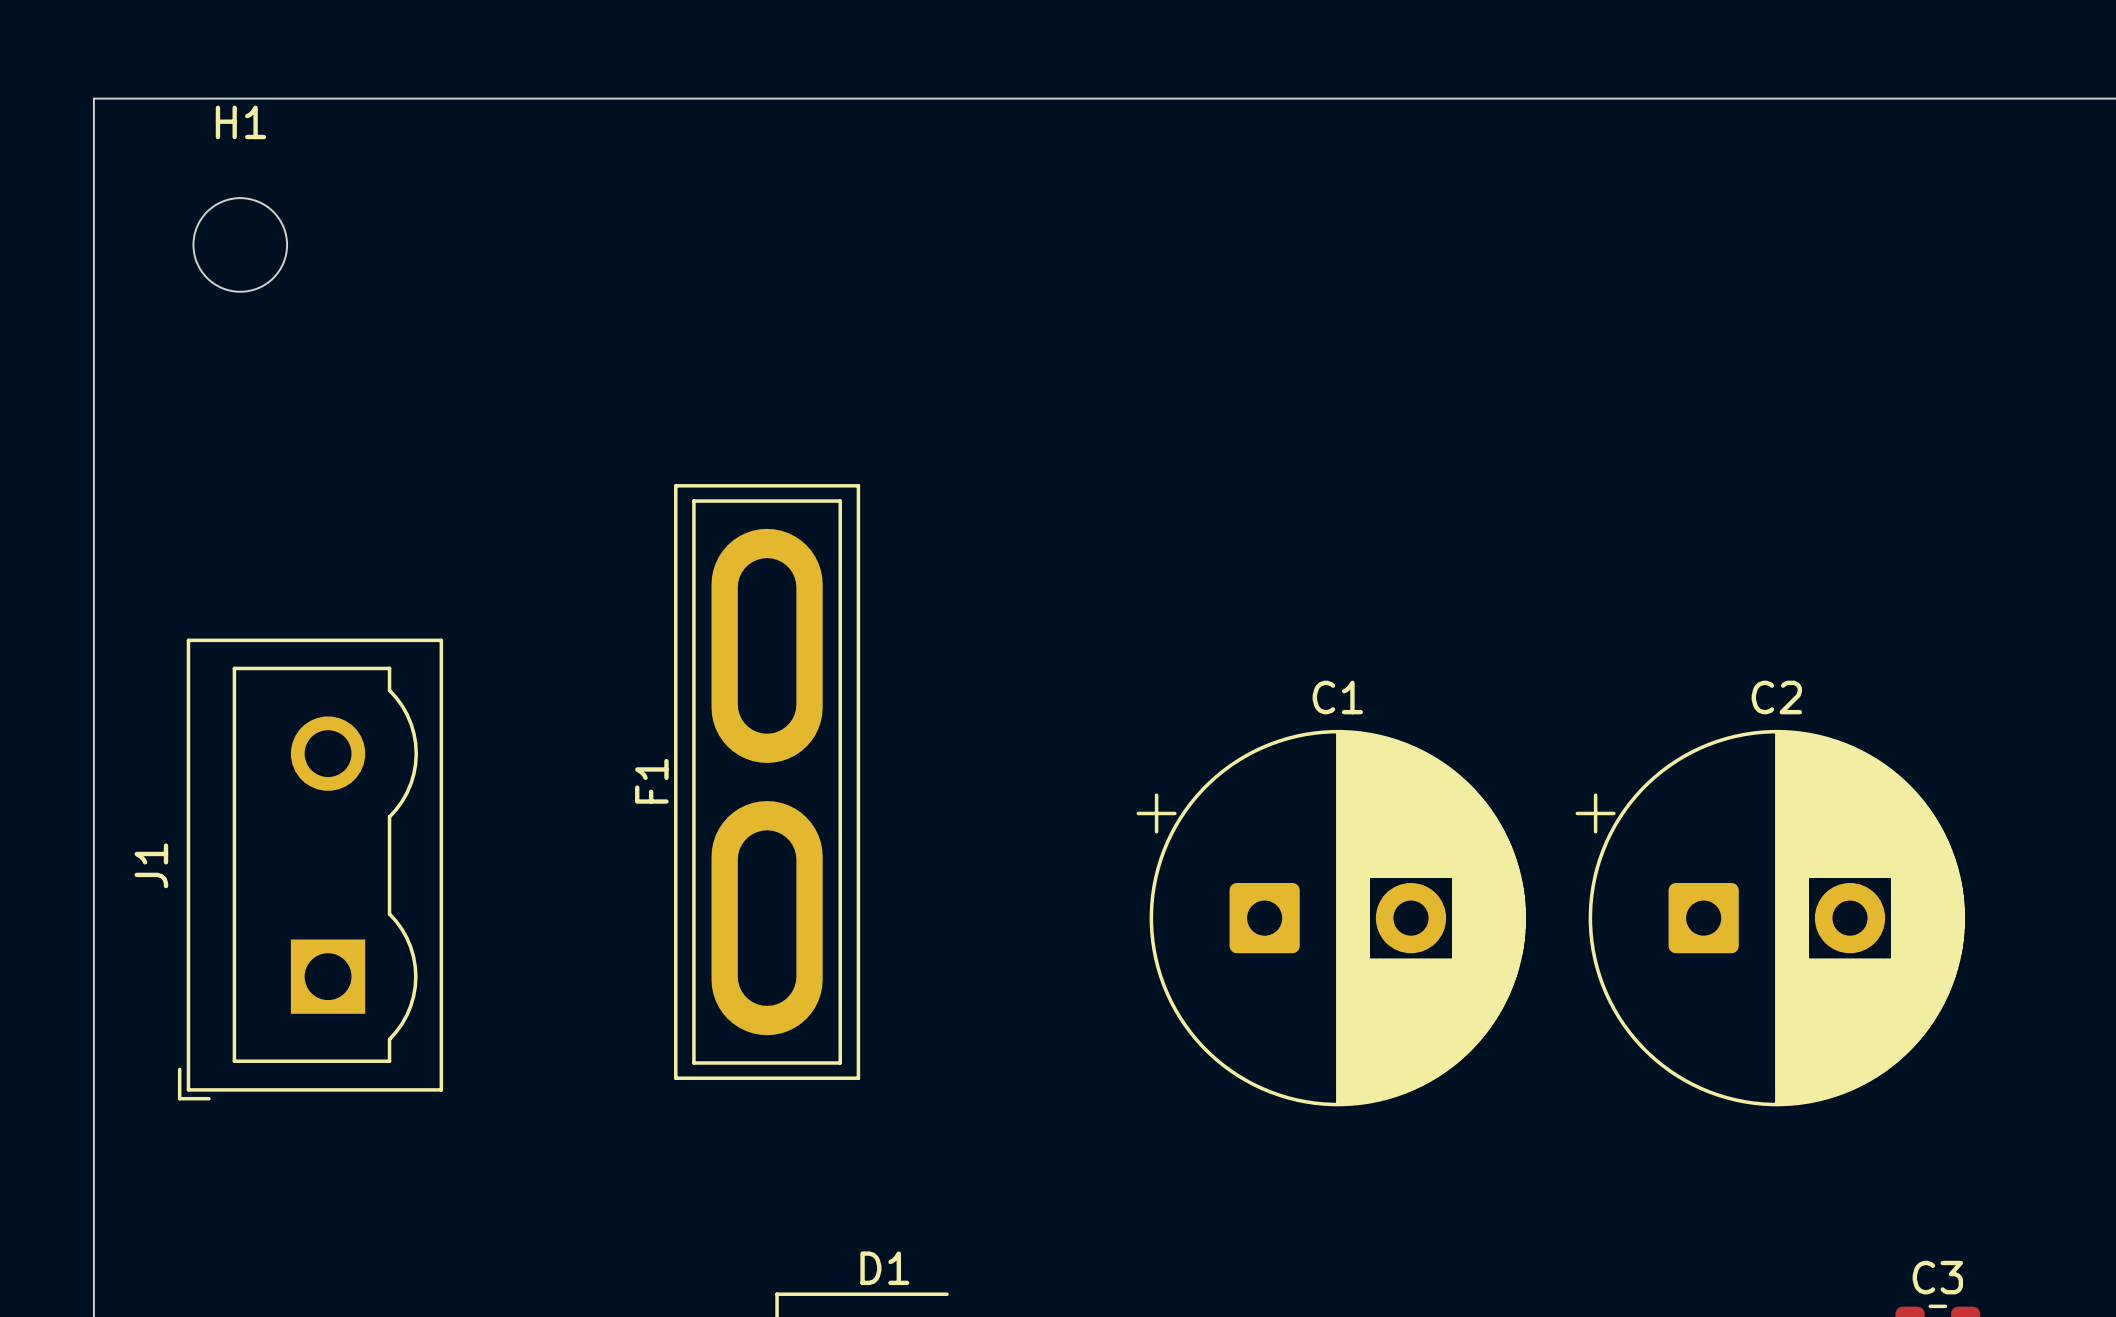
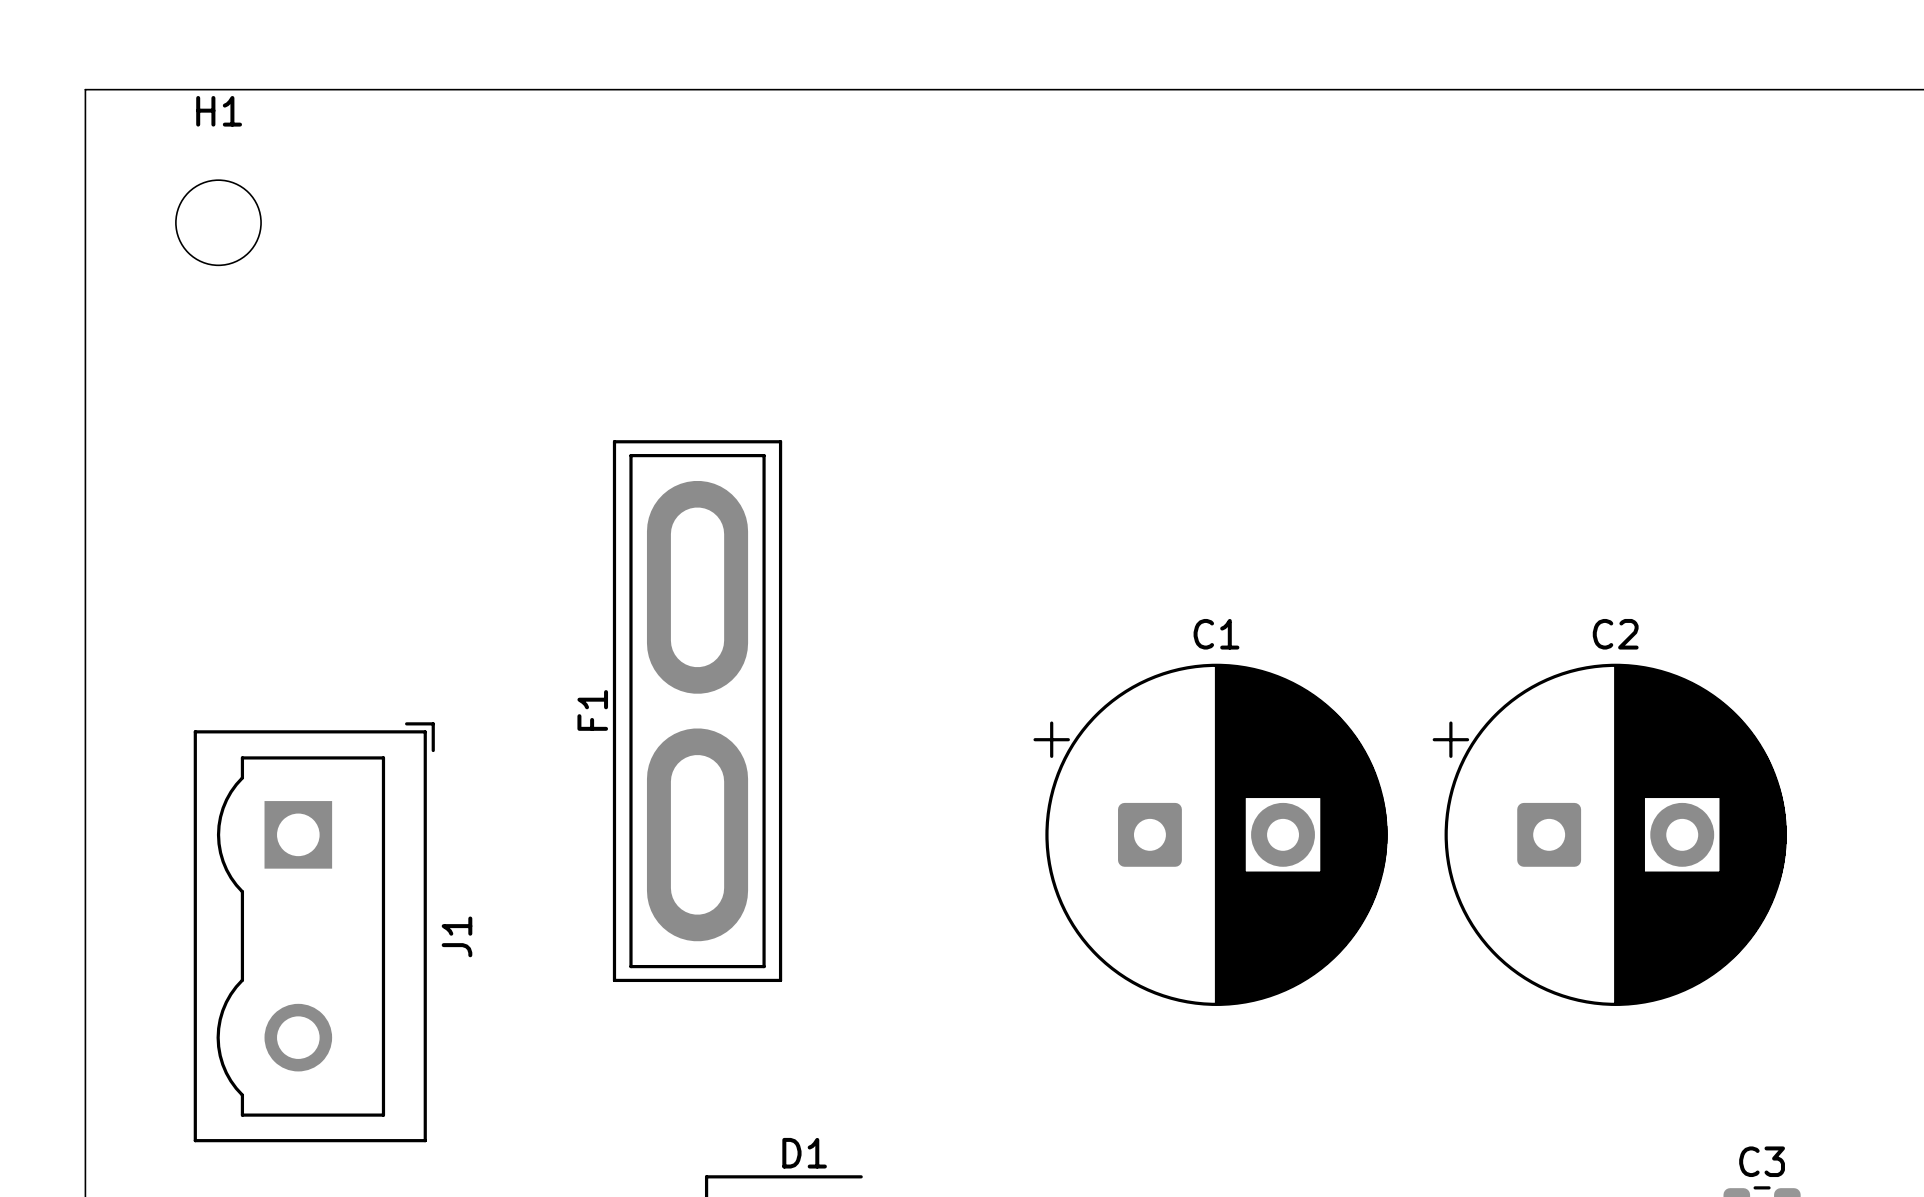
J1 rotation: 0° (310, 869) -> 180° (314, 932)

